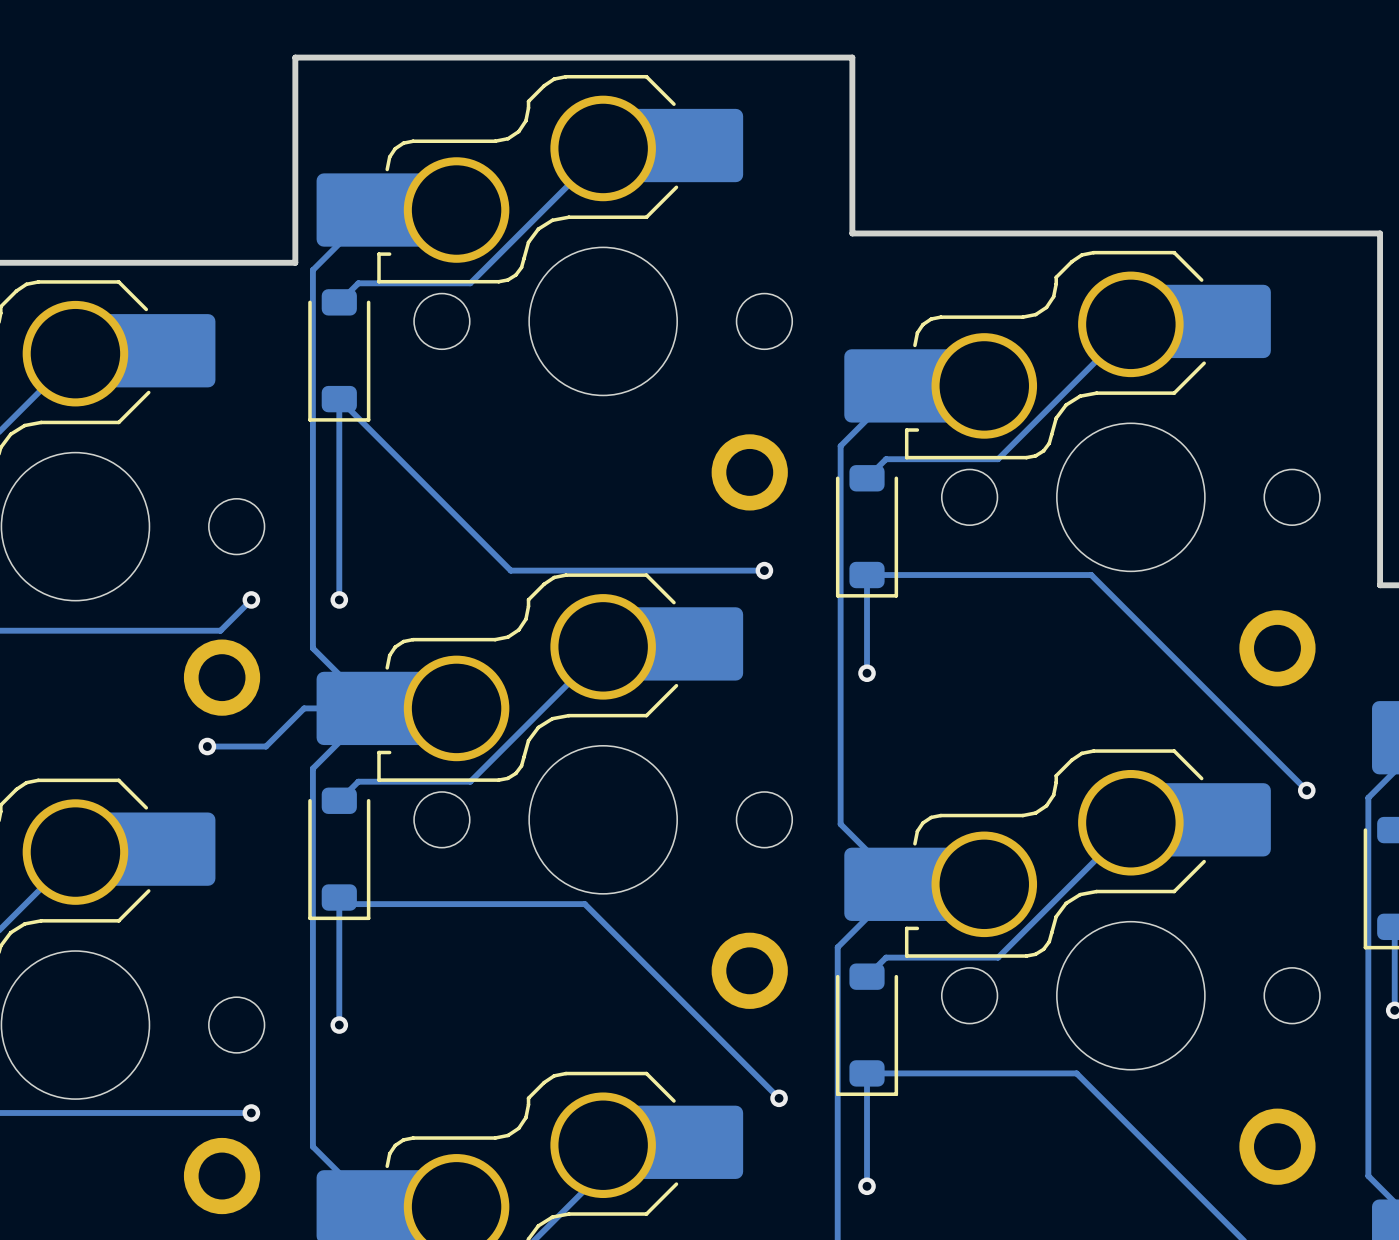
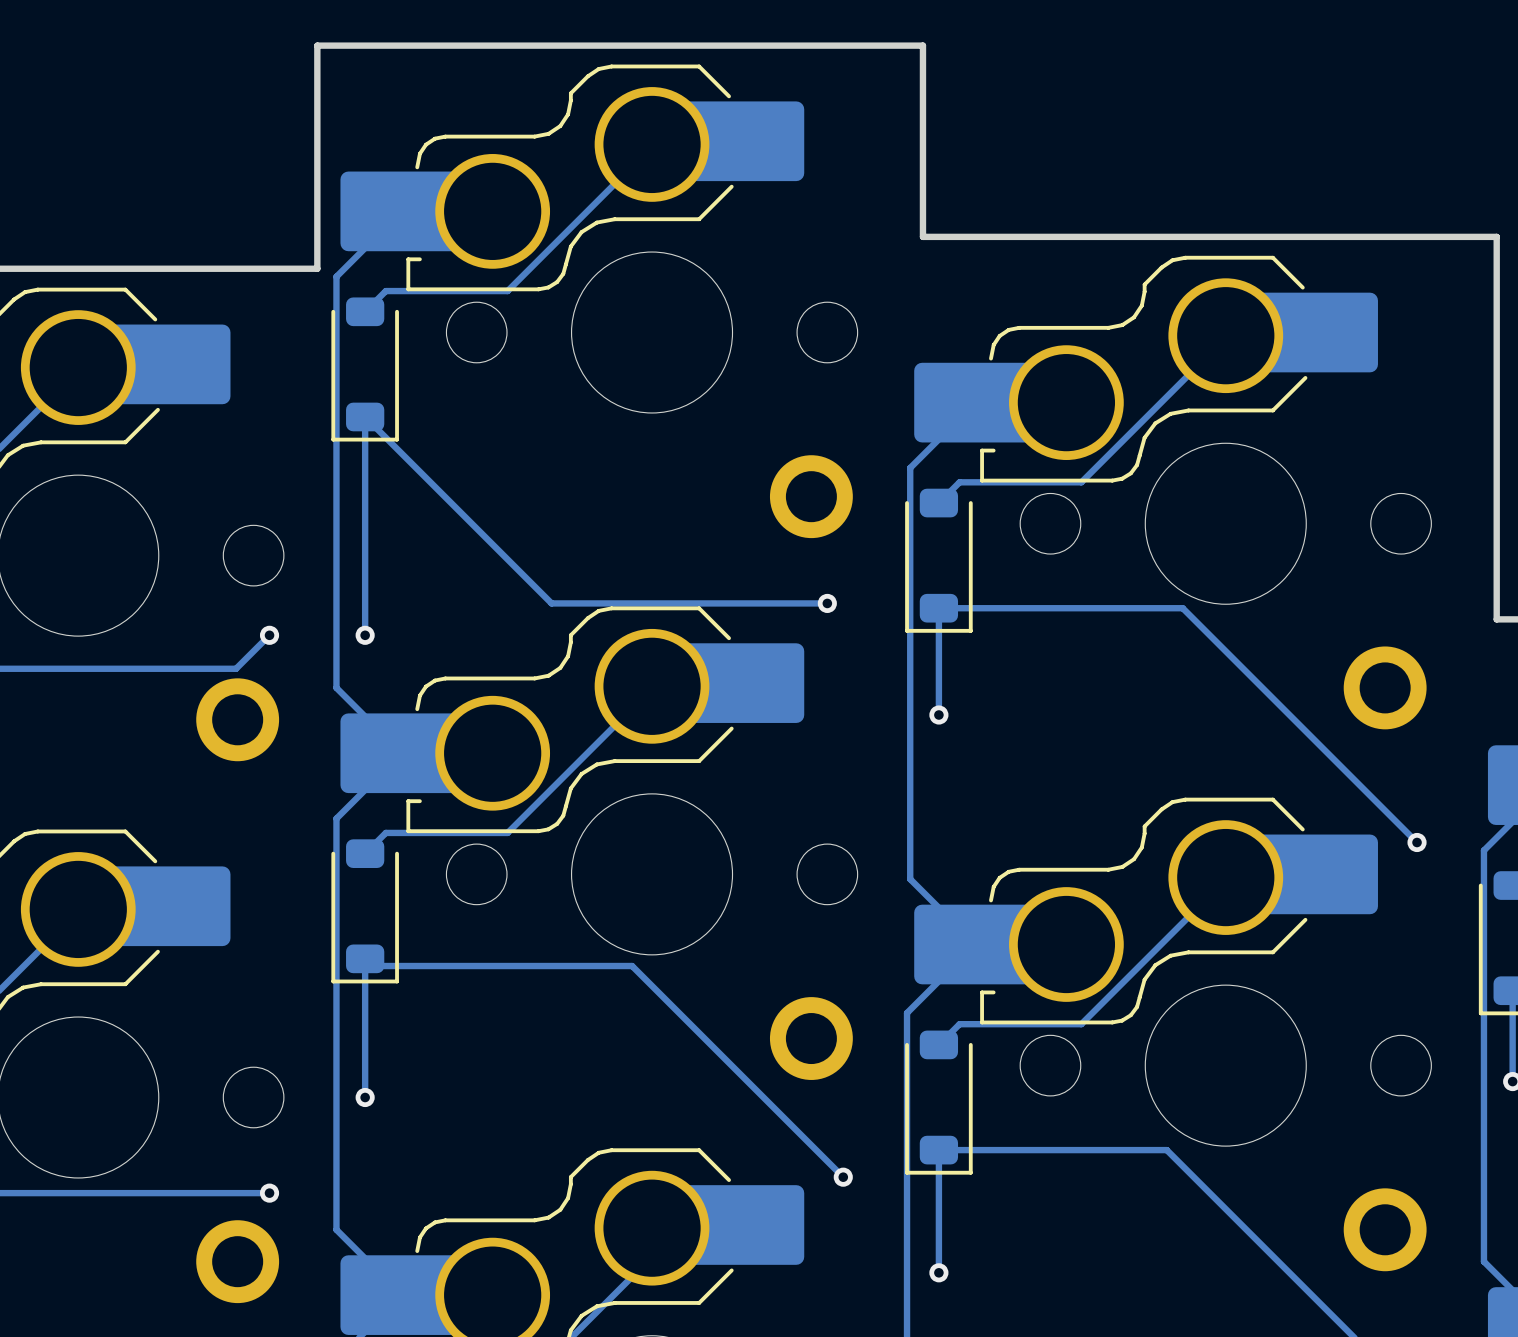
track: (373, 708) (304, 708) (266, 746) (207, 746) -> none
via: (207, 746) -> none

